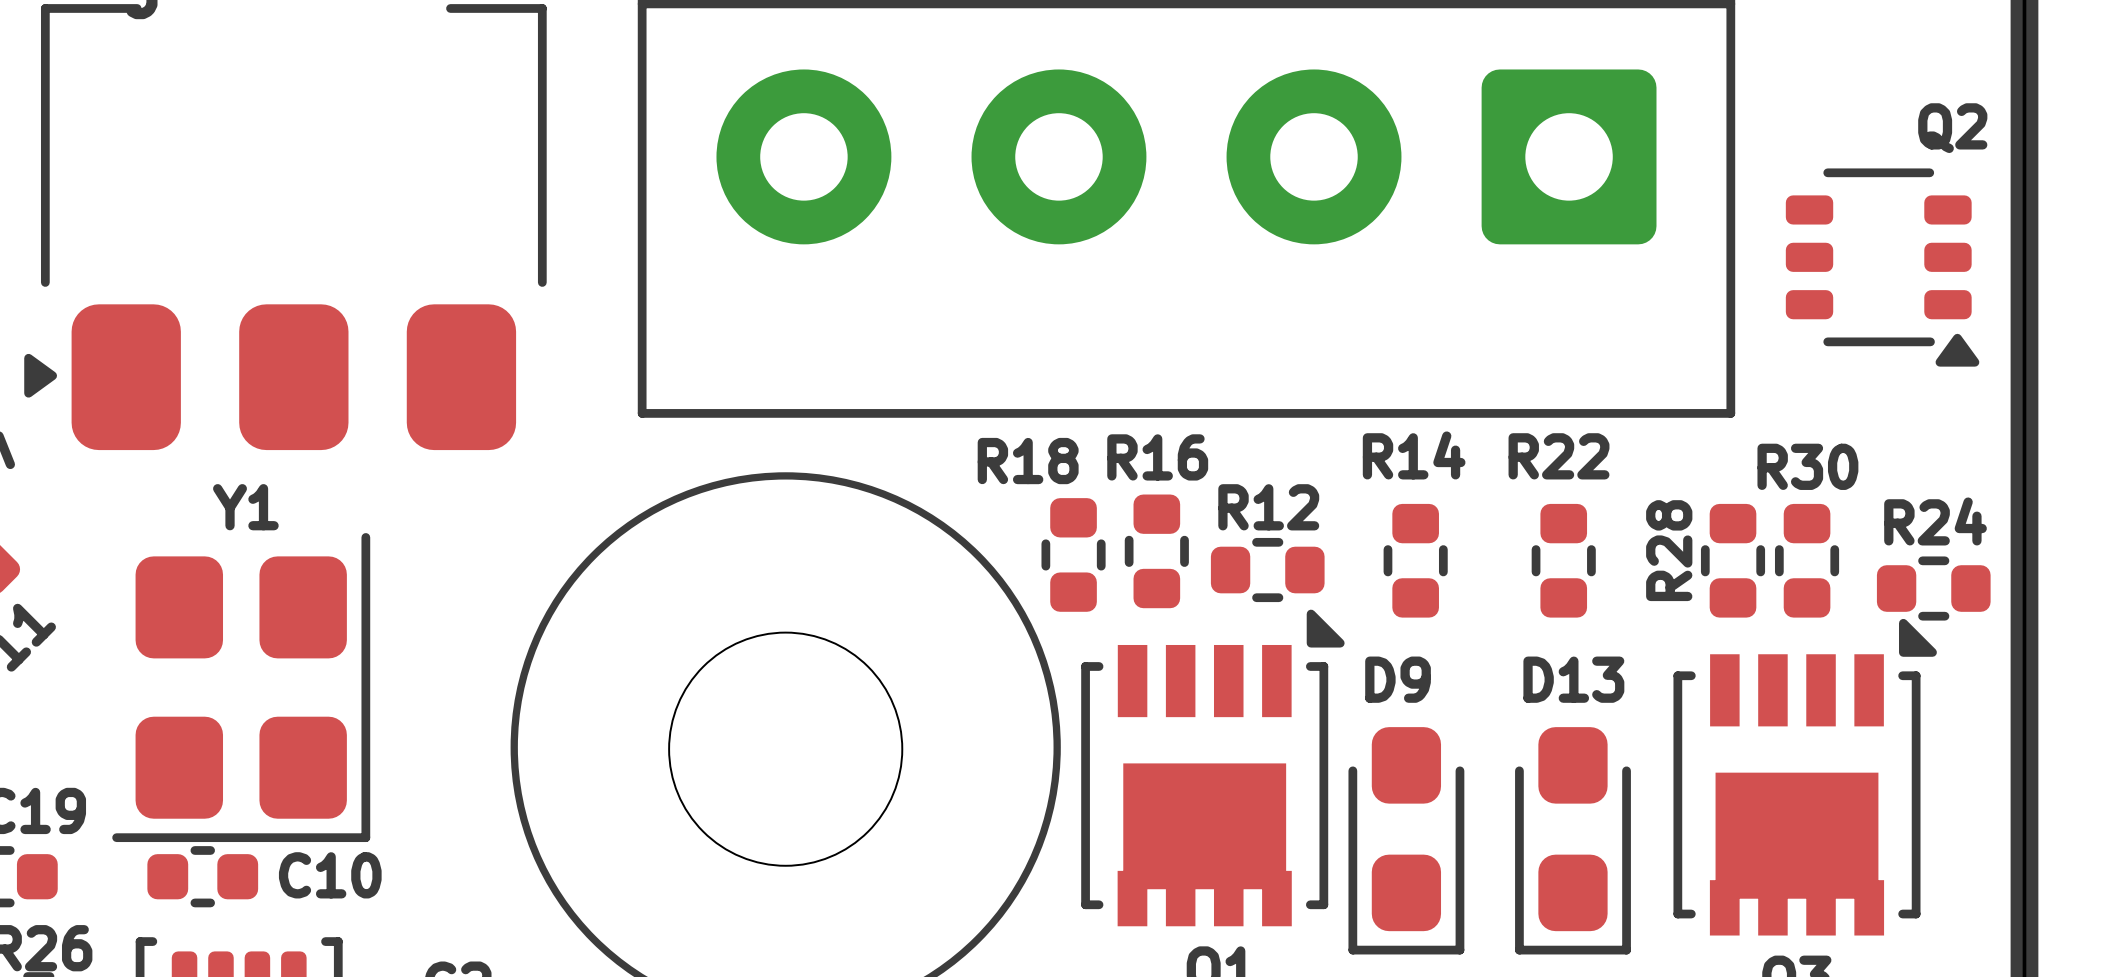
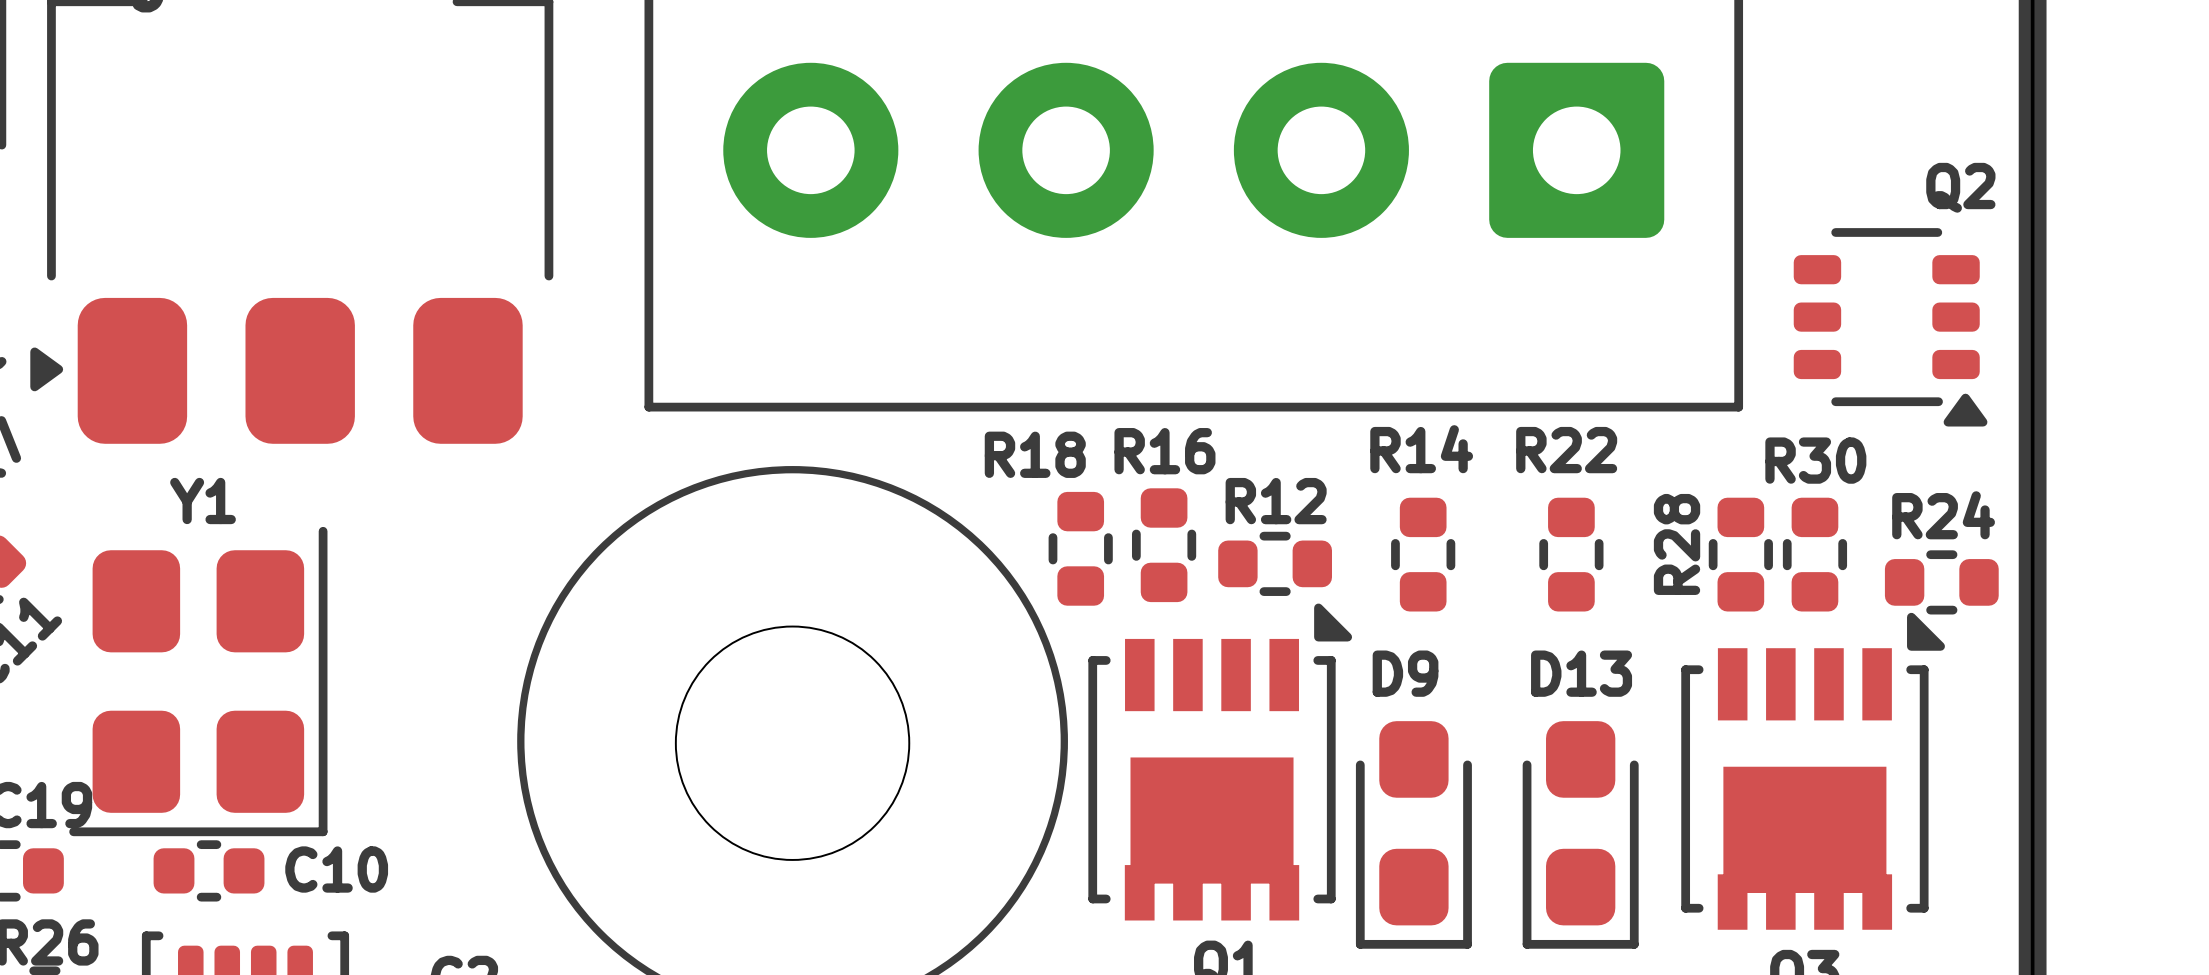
Q2 position: (1882, 267) -> (1890, 327)
Y1 position: (241, 687) -> (198, 681)

